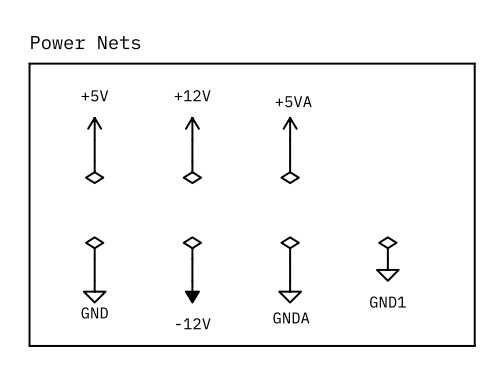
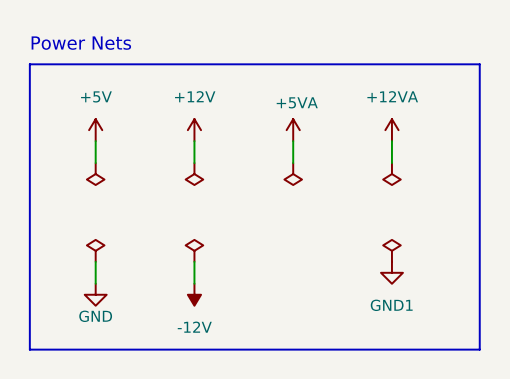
power symbol: none -> +12VA (391, 130)
power symbol rotation: 0° (290, 248) -> 180° (391, 174)
power symbol position: (290, 248) -> (391, 174)
wire: (290, 259) (290, 280) -> (391, 141) (391, 163)
power symbol: GNDA (290, 291) -> none

